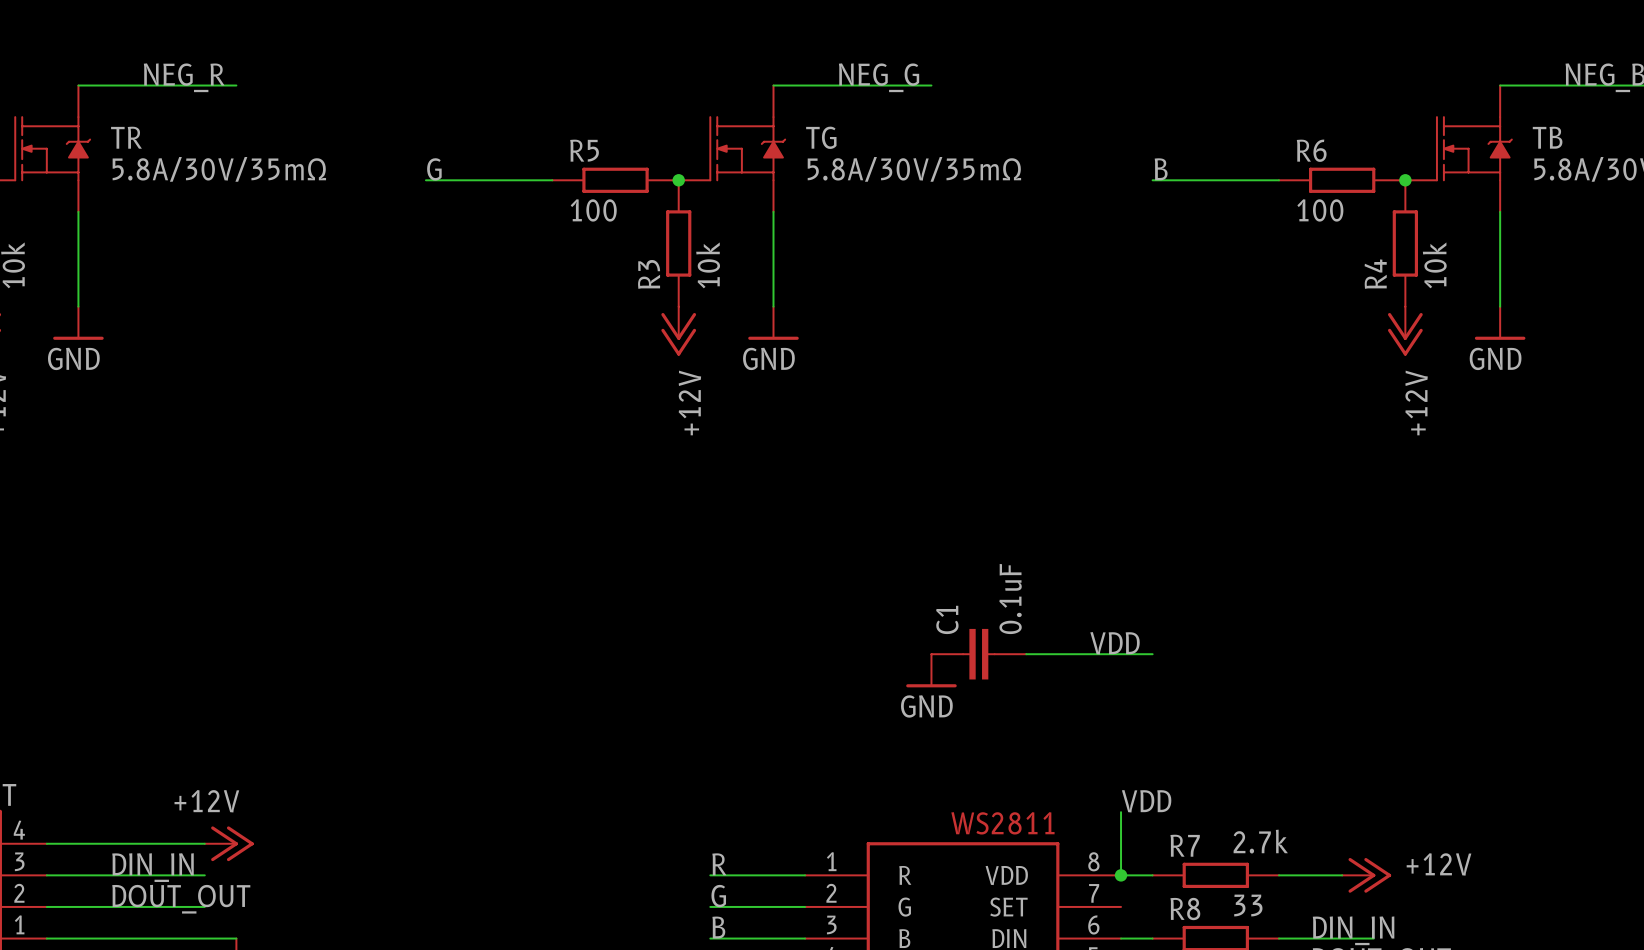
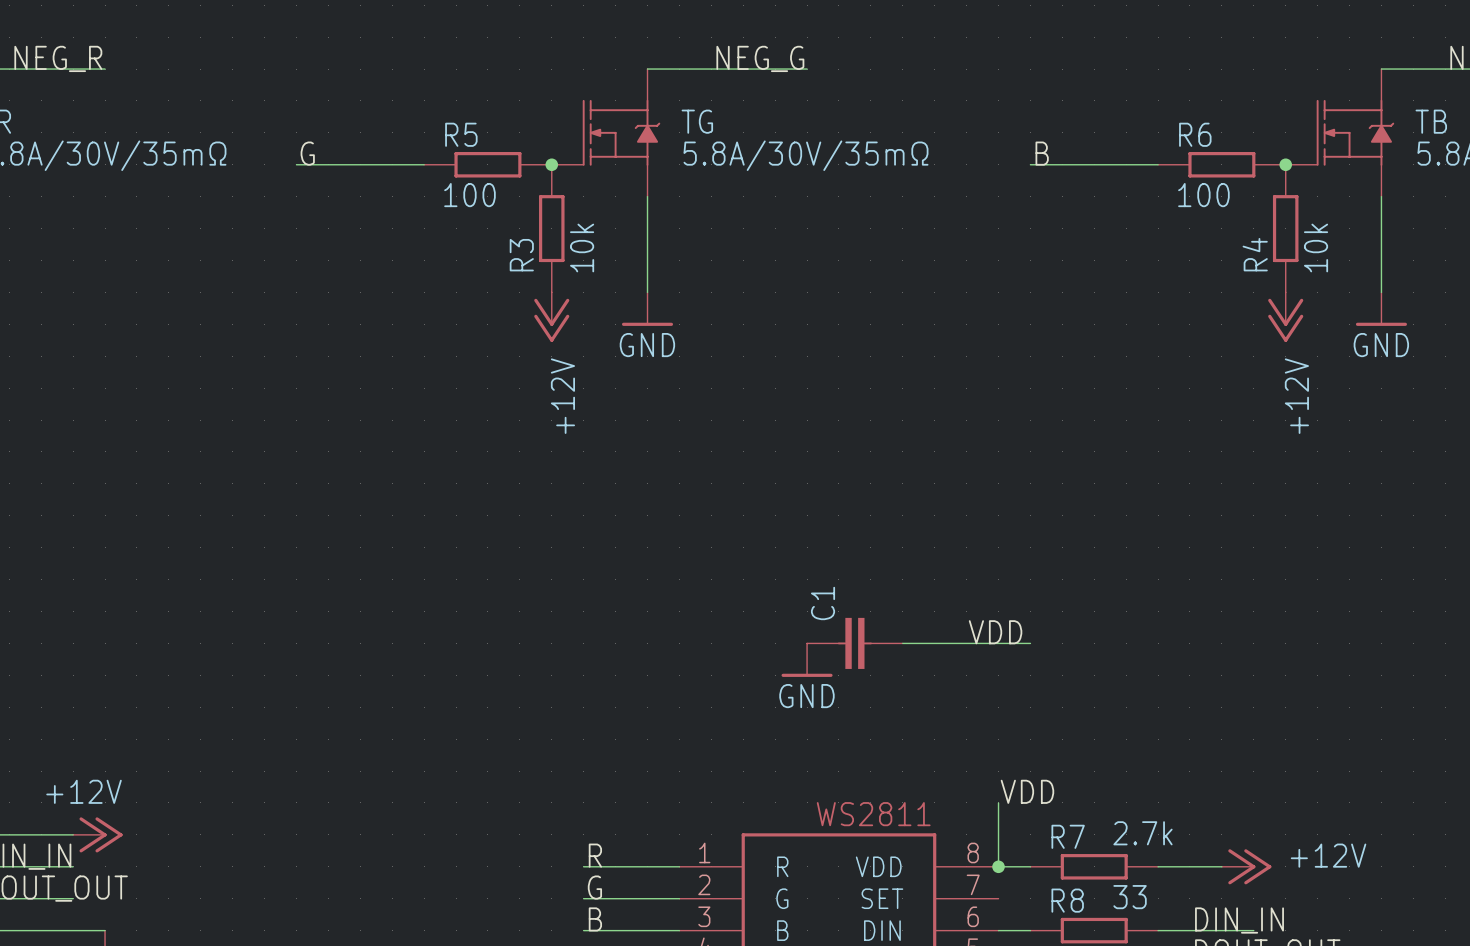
C1 value: 0.1uF (1010, 599) -> none

